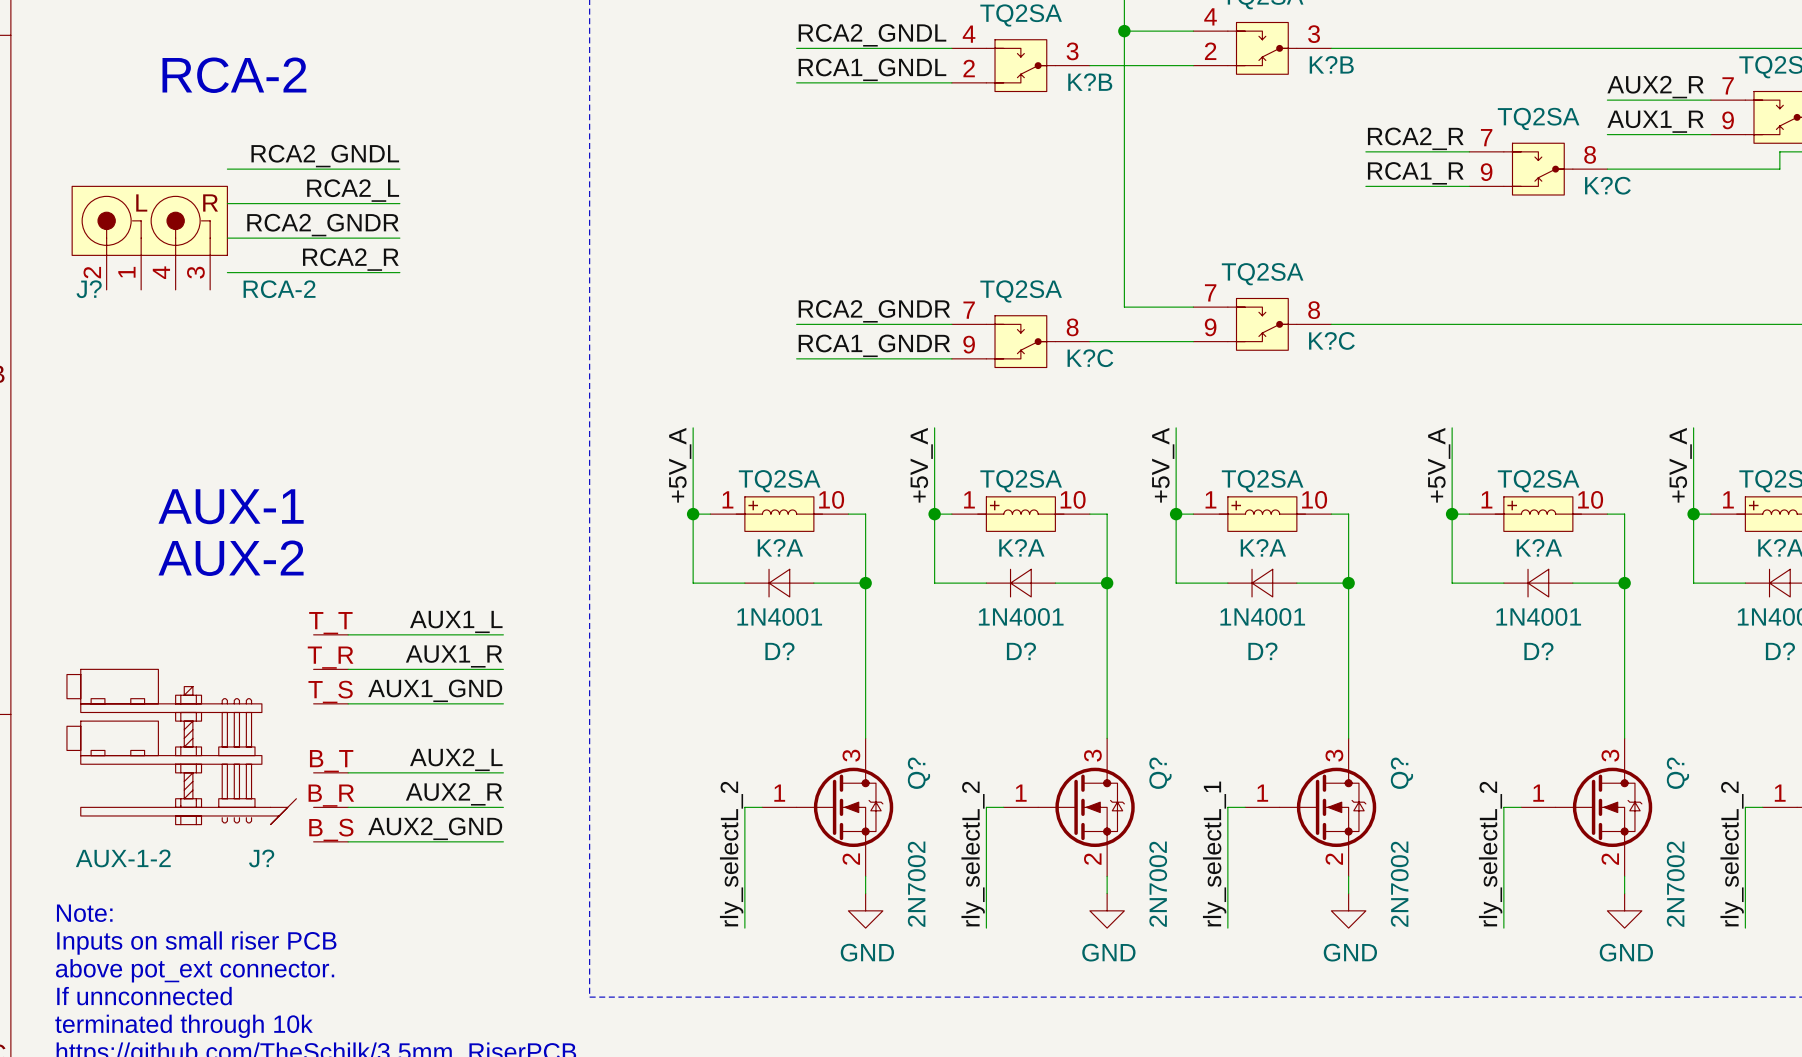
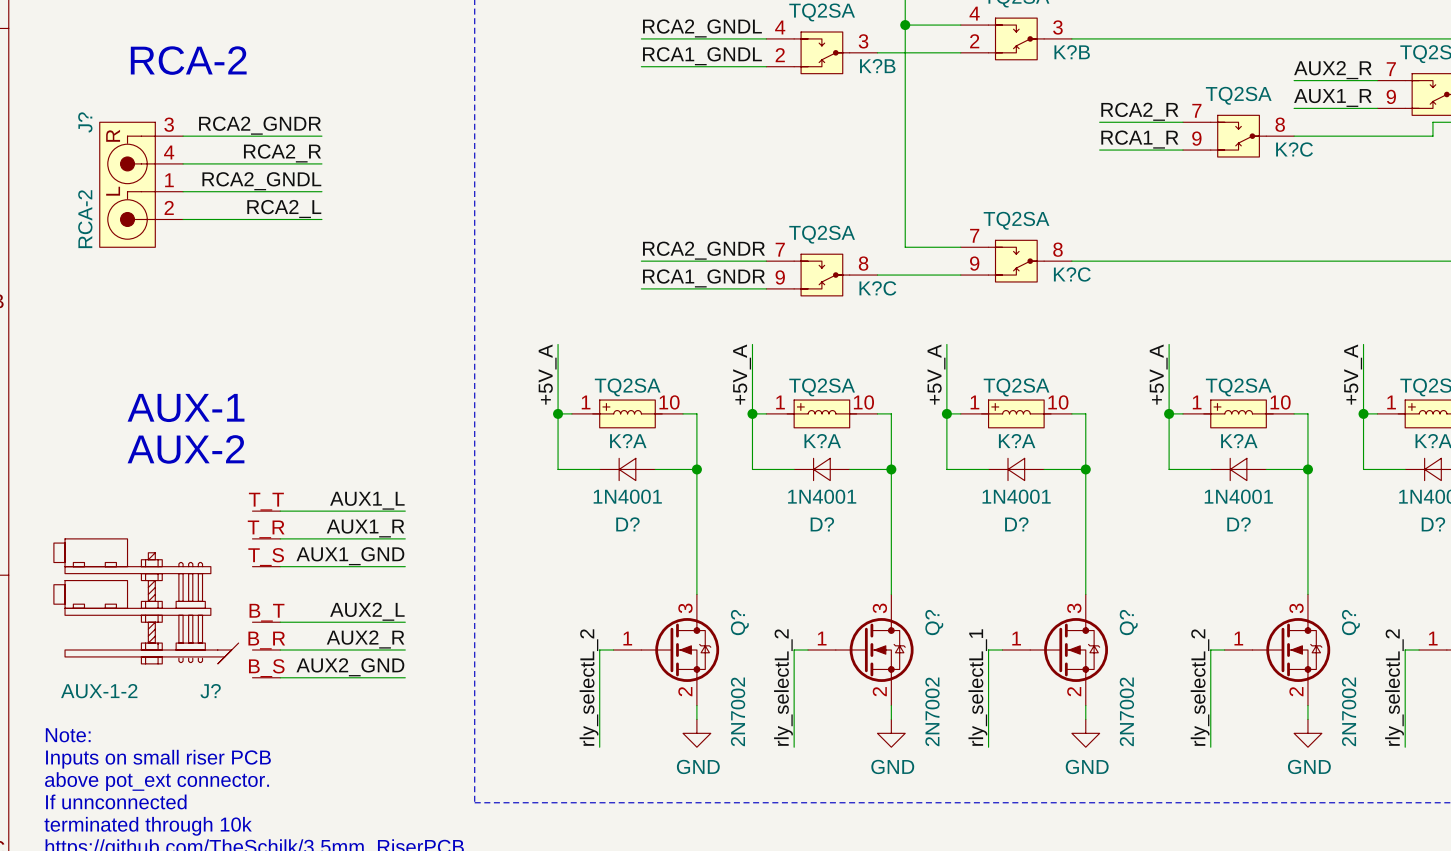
label: RCA2_GNDL (325, 156) -> RCA2_GNDR (260, 125)
label: RCA2_L (353, 190) -> RCA2_R (282, 153)
J? rotation: 0° (149, 220) -> 90° counterclockwise (127, 184)
label: RCA2_GNDR (323, 225) -> RCA2_GNDL (261, 181)
label: RCA2_R (350, 259) -> RCA2_L (284, 208)
J? name position: J? (89, 289) -> J? (85, 122)
J? value position: RCA-2 (279, 289) -> RCA-2 (85, 219)

